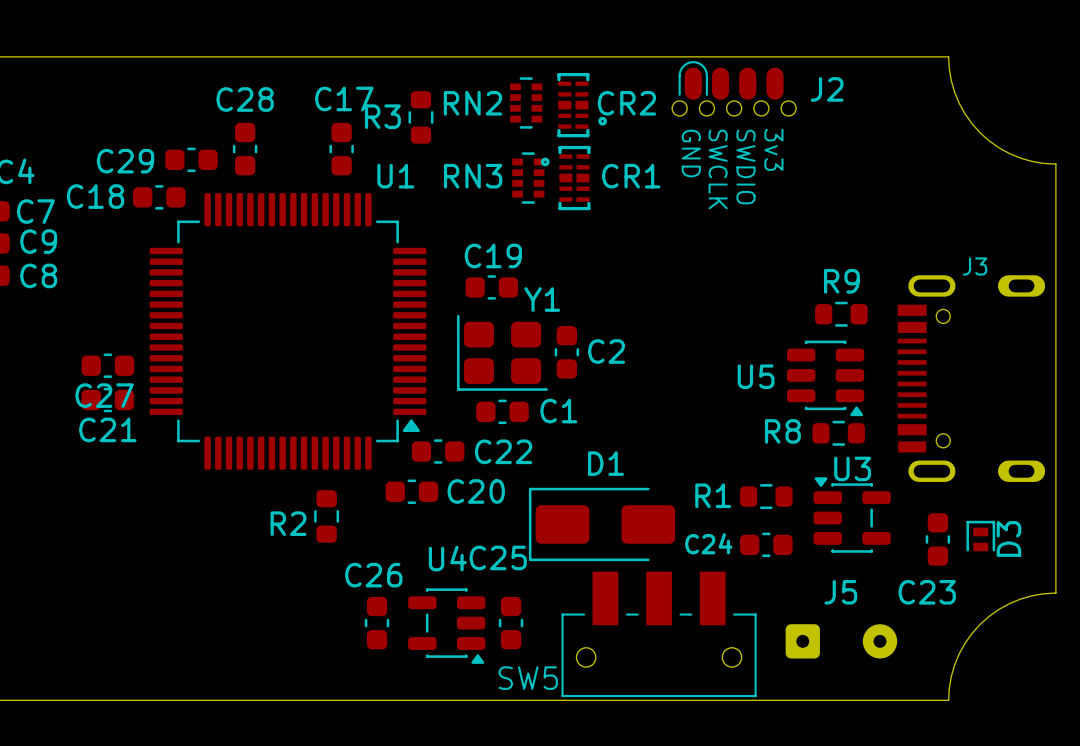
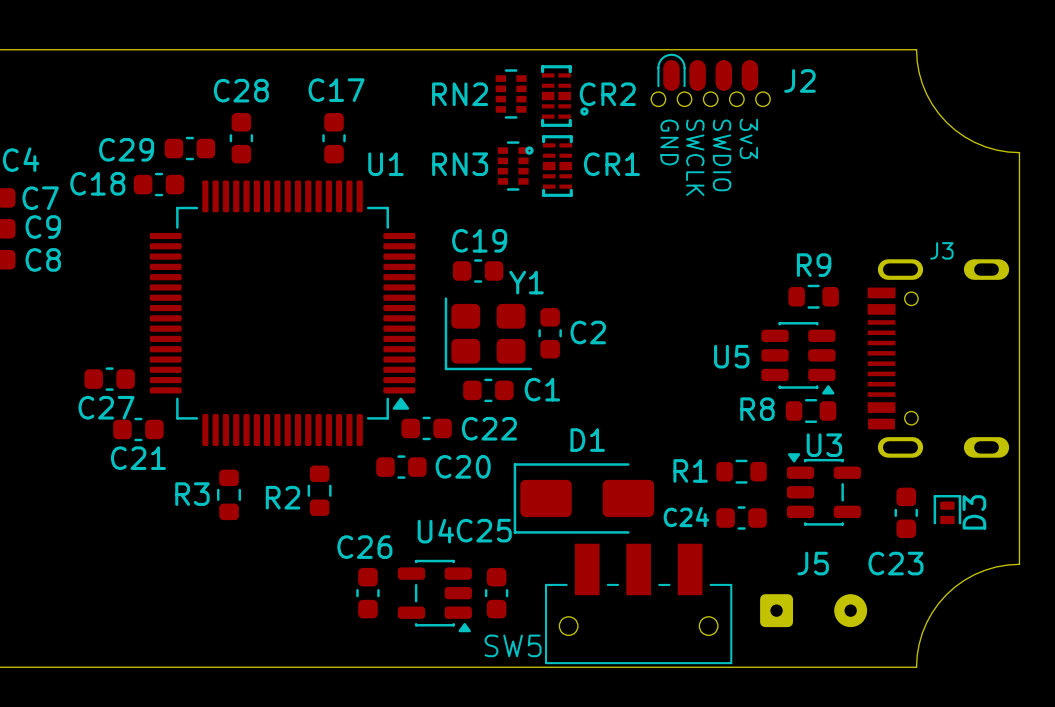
R3 position: (420, 117) -> (229, 494)
C27: (107, 365) -> none
C21 name: C21 (107, 429) -> C27 (106, 407)
C21: none -> (138, 429)

